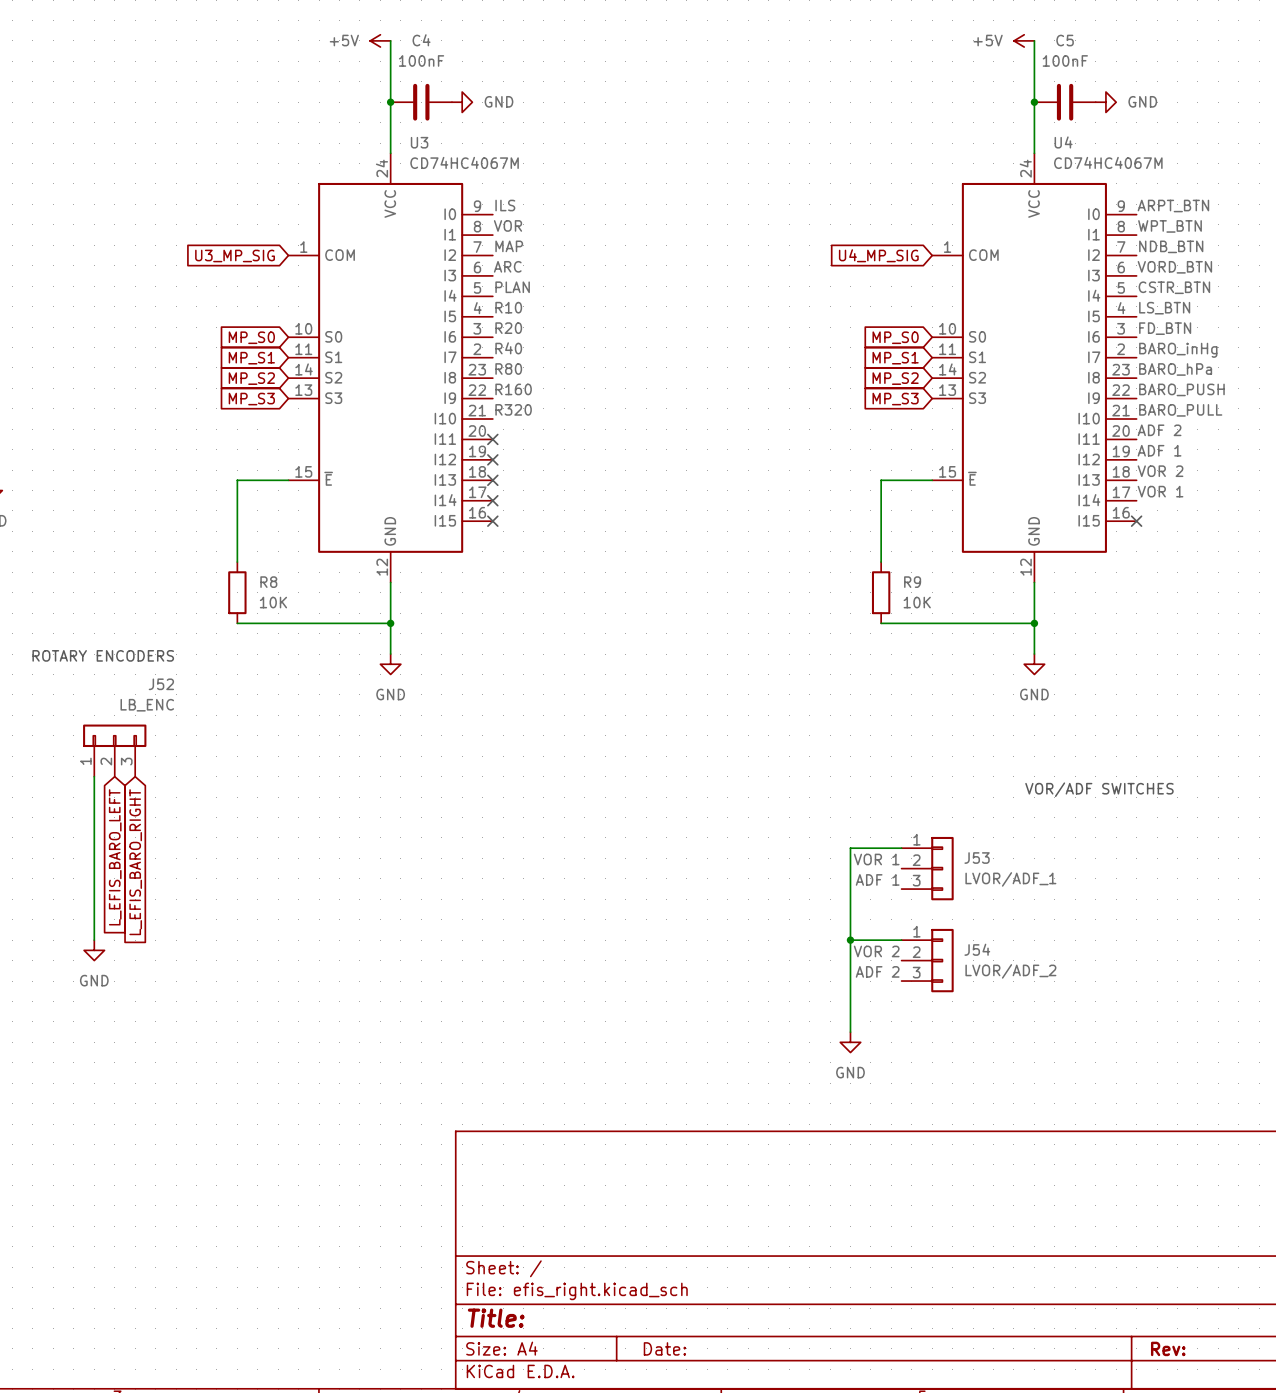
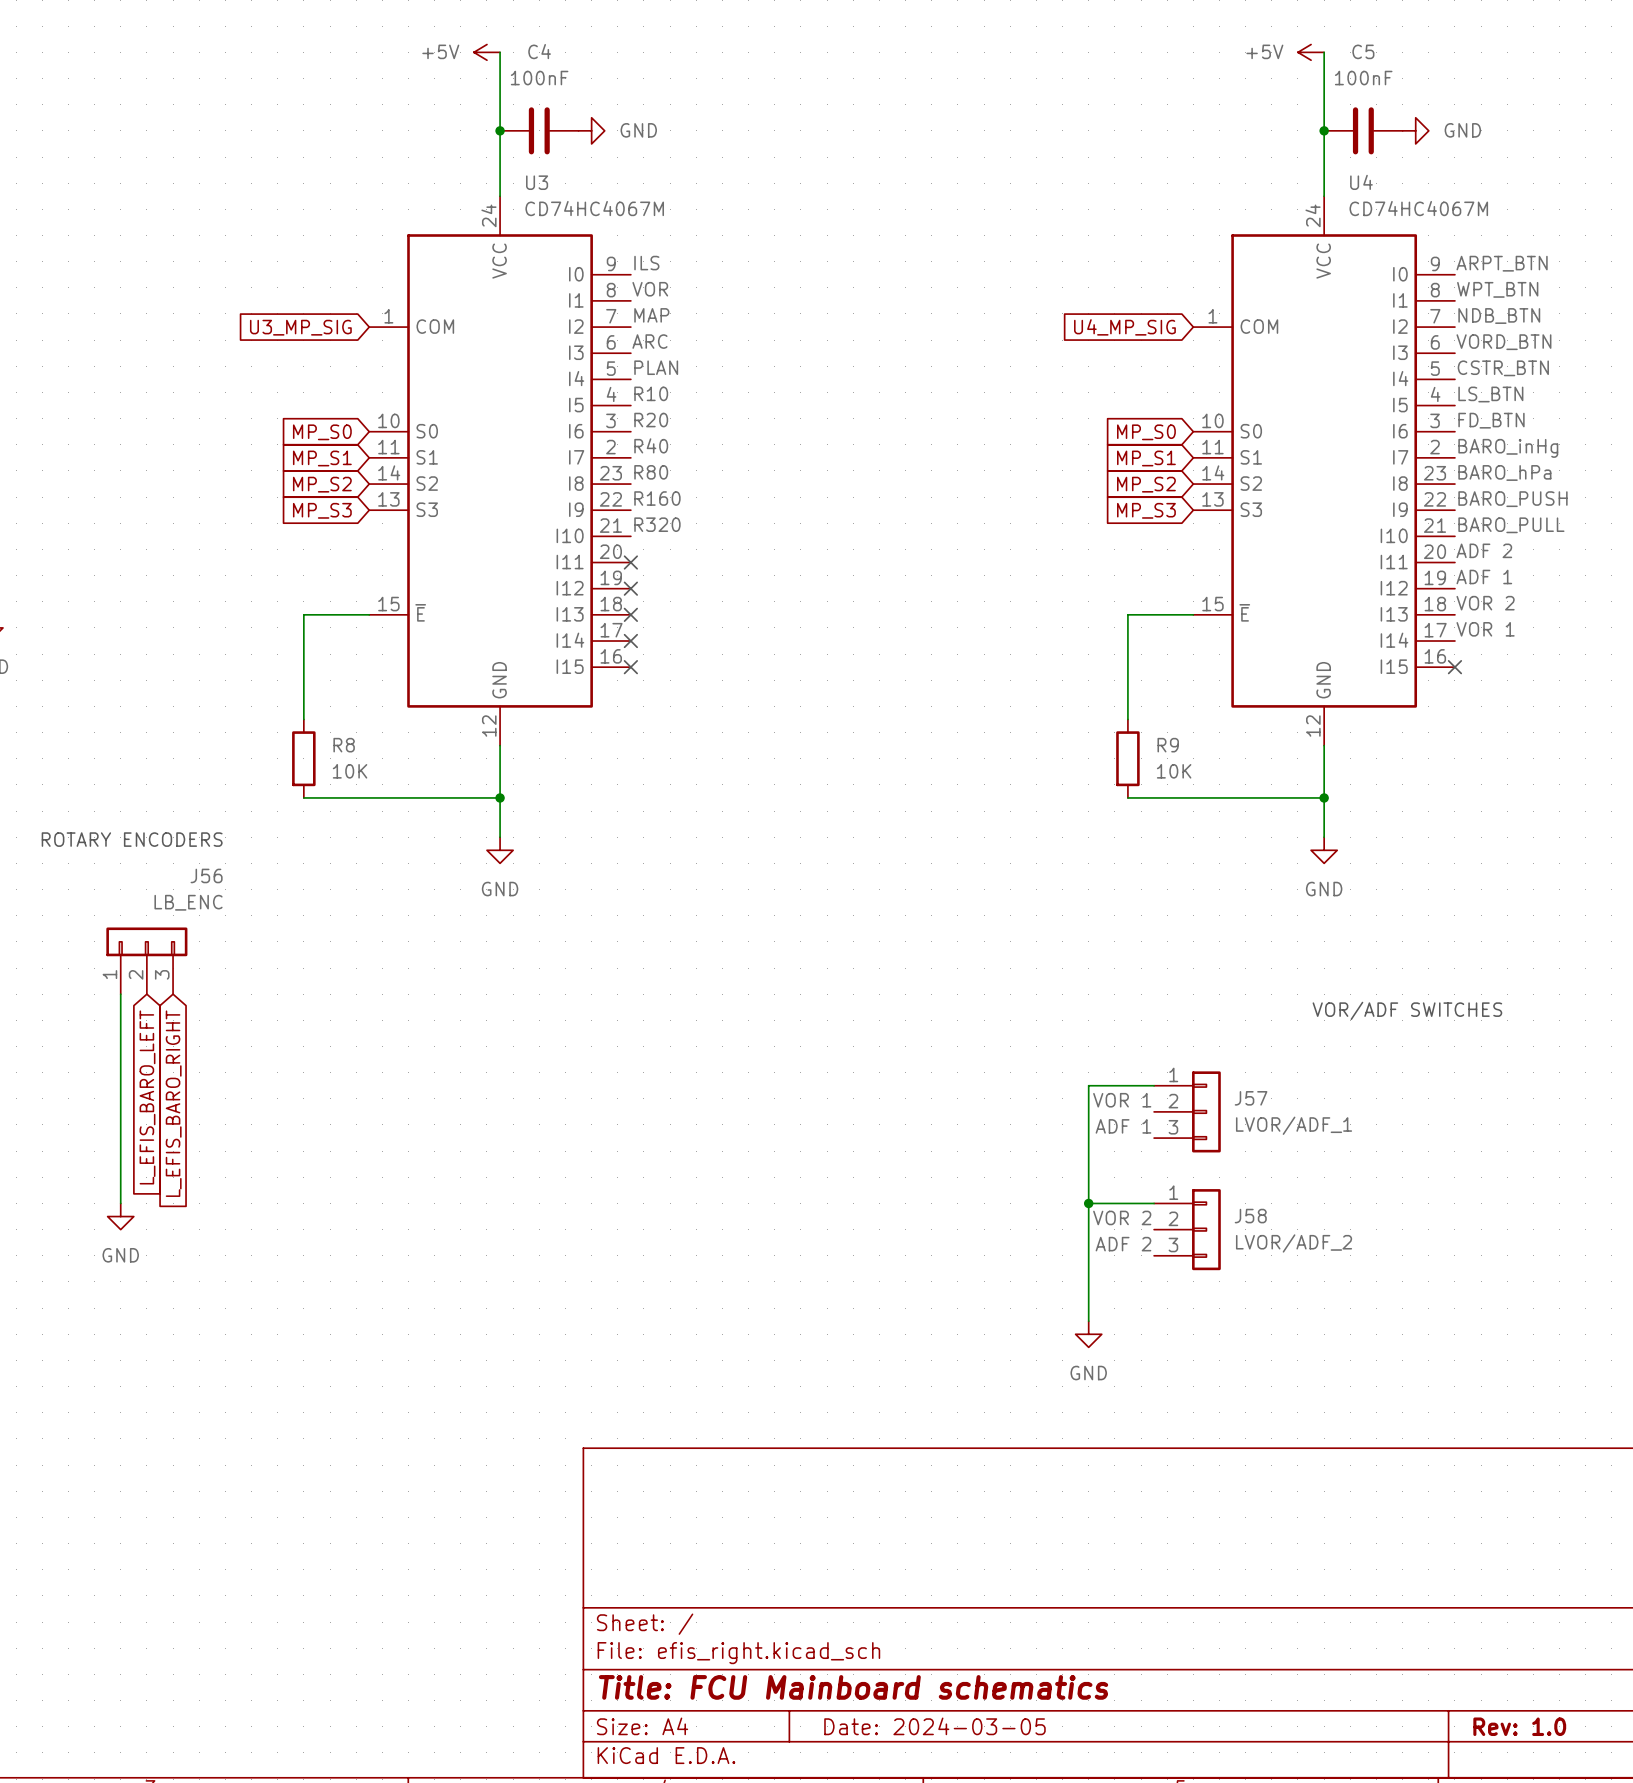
J52 name: J52 (161, 684) -> J56 (206, 875)
J53 name: J53 (977, 858) -> J57 (1251, 1098)
J54 name: J54 (977, 949) -> J58 (1250, 1216)
title block: Title: (496, 1318) -> Title: FCU Mainboard schematics (853, 1687)
title block: Date: (664, 1348) -> Date: 2024-03-05 (934, 1726)
title block: Rev: (1168, 1348) -> Rev: 1.0 (1519, 1726)

